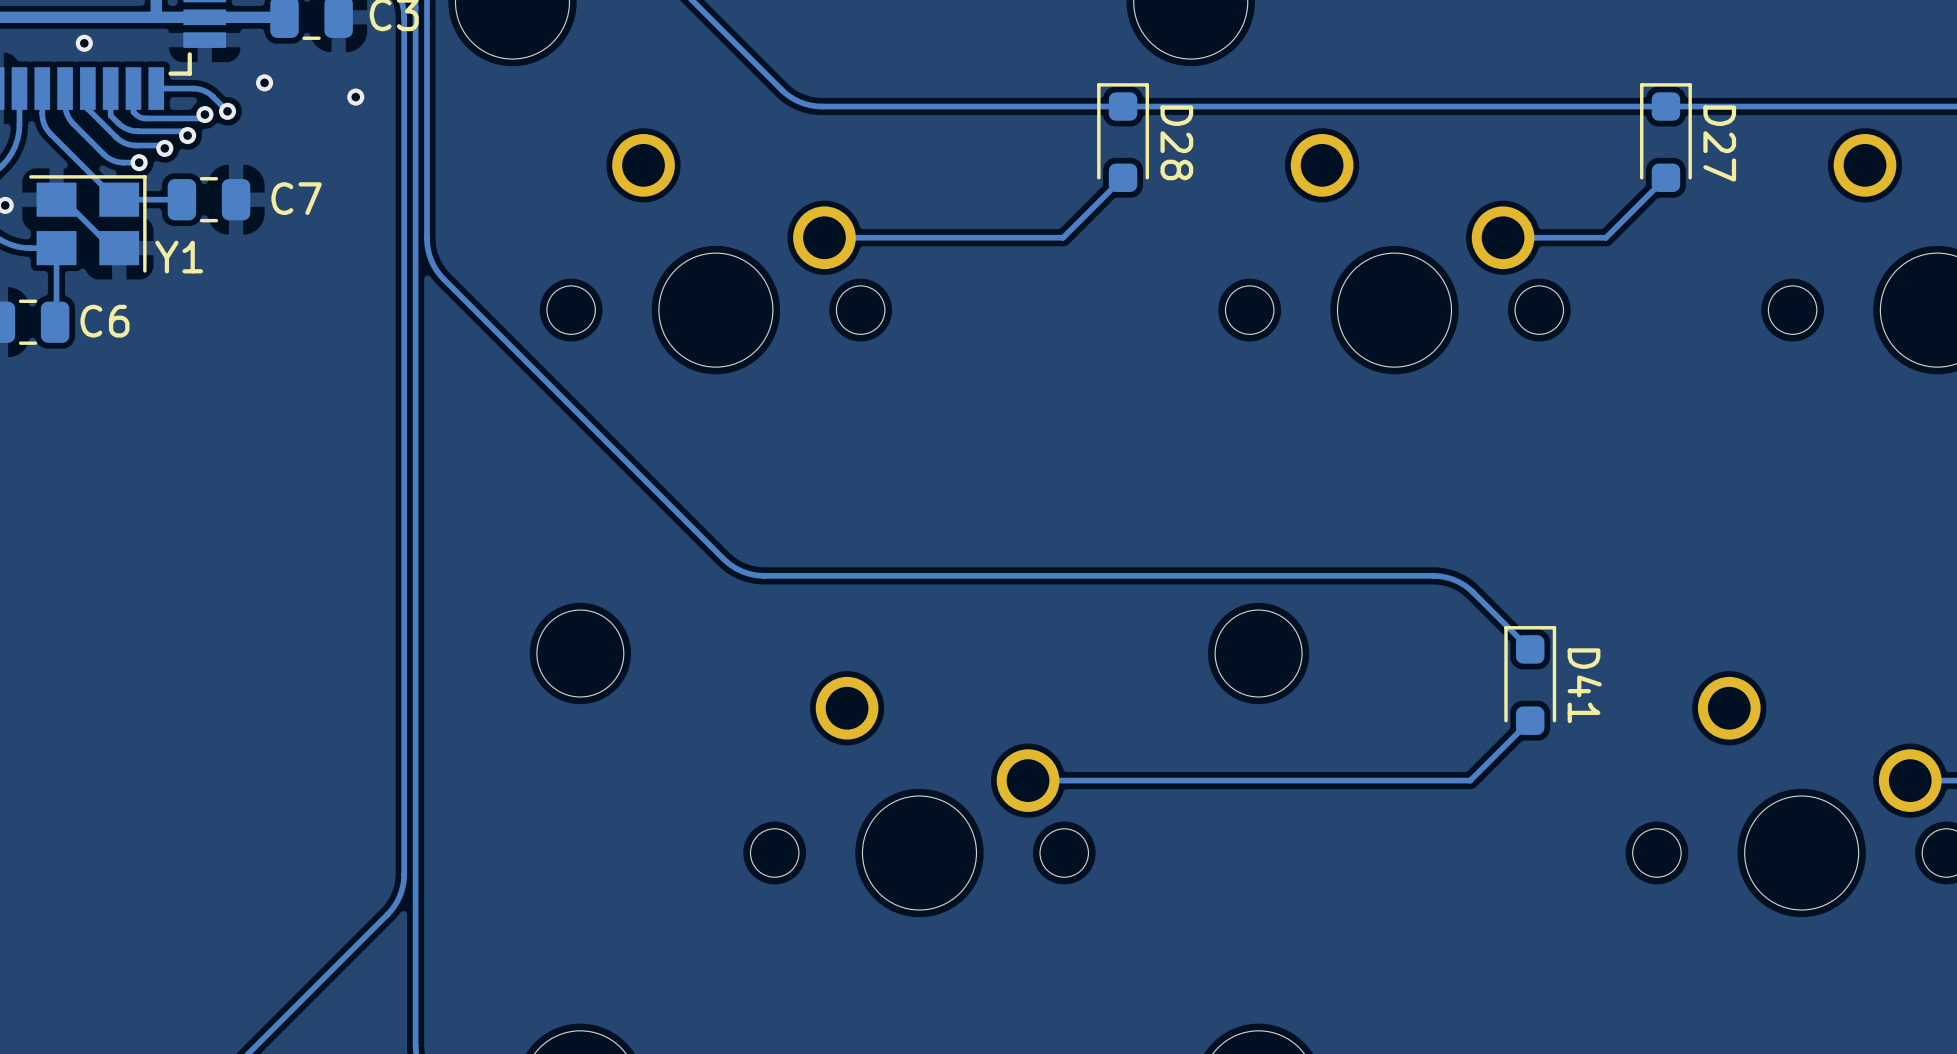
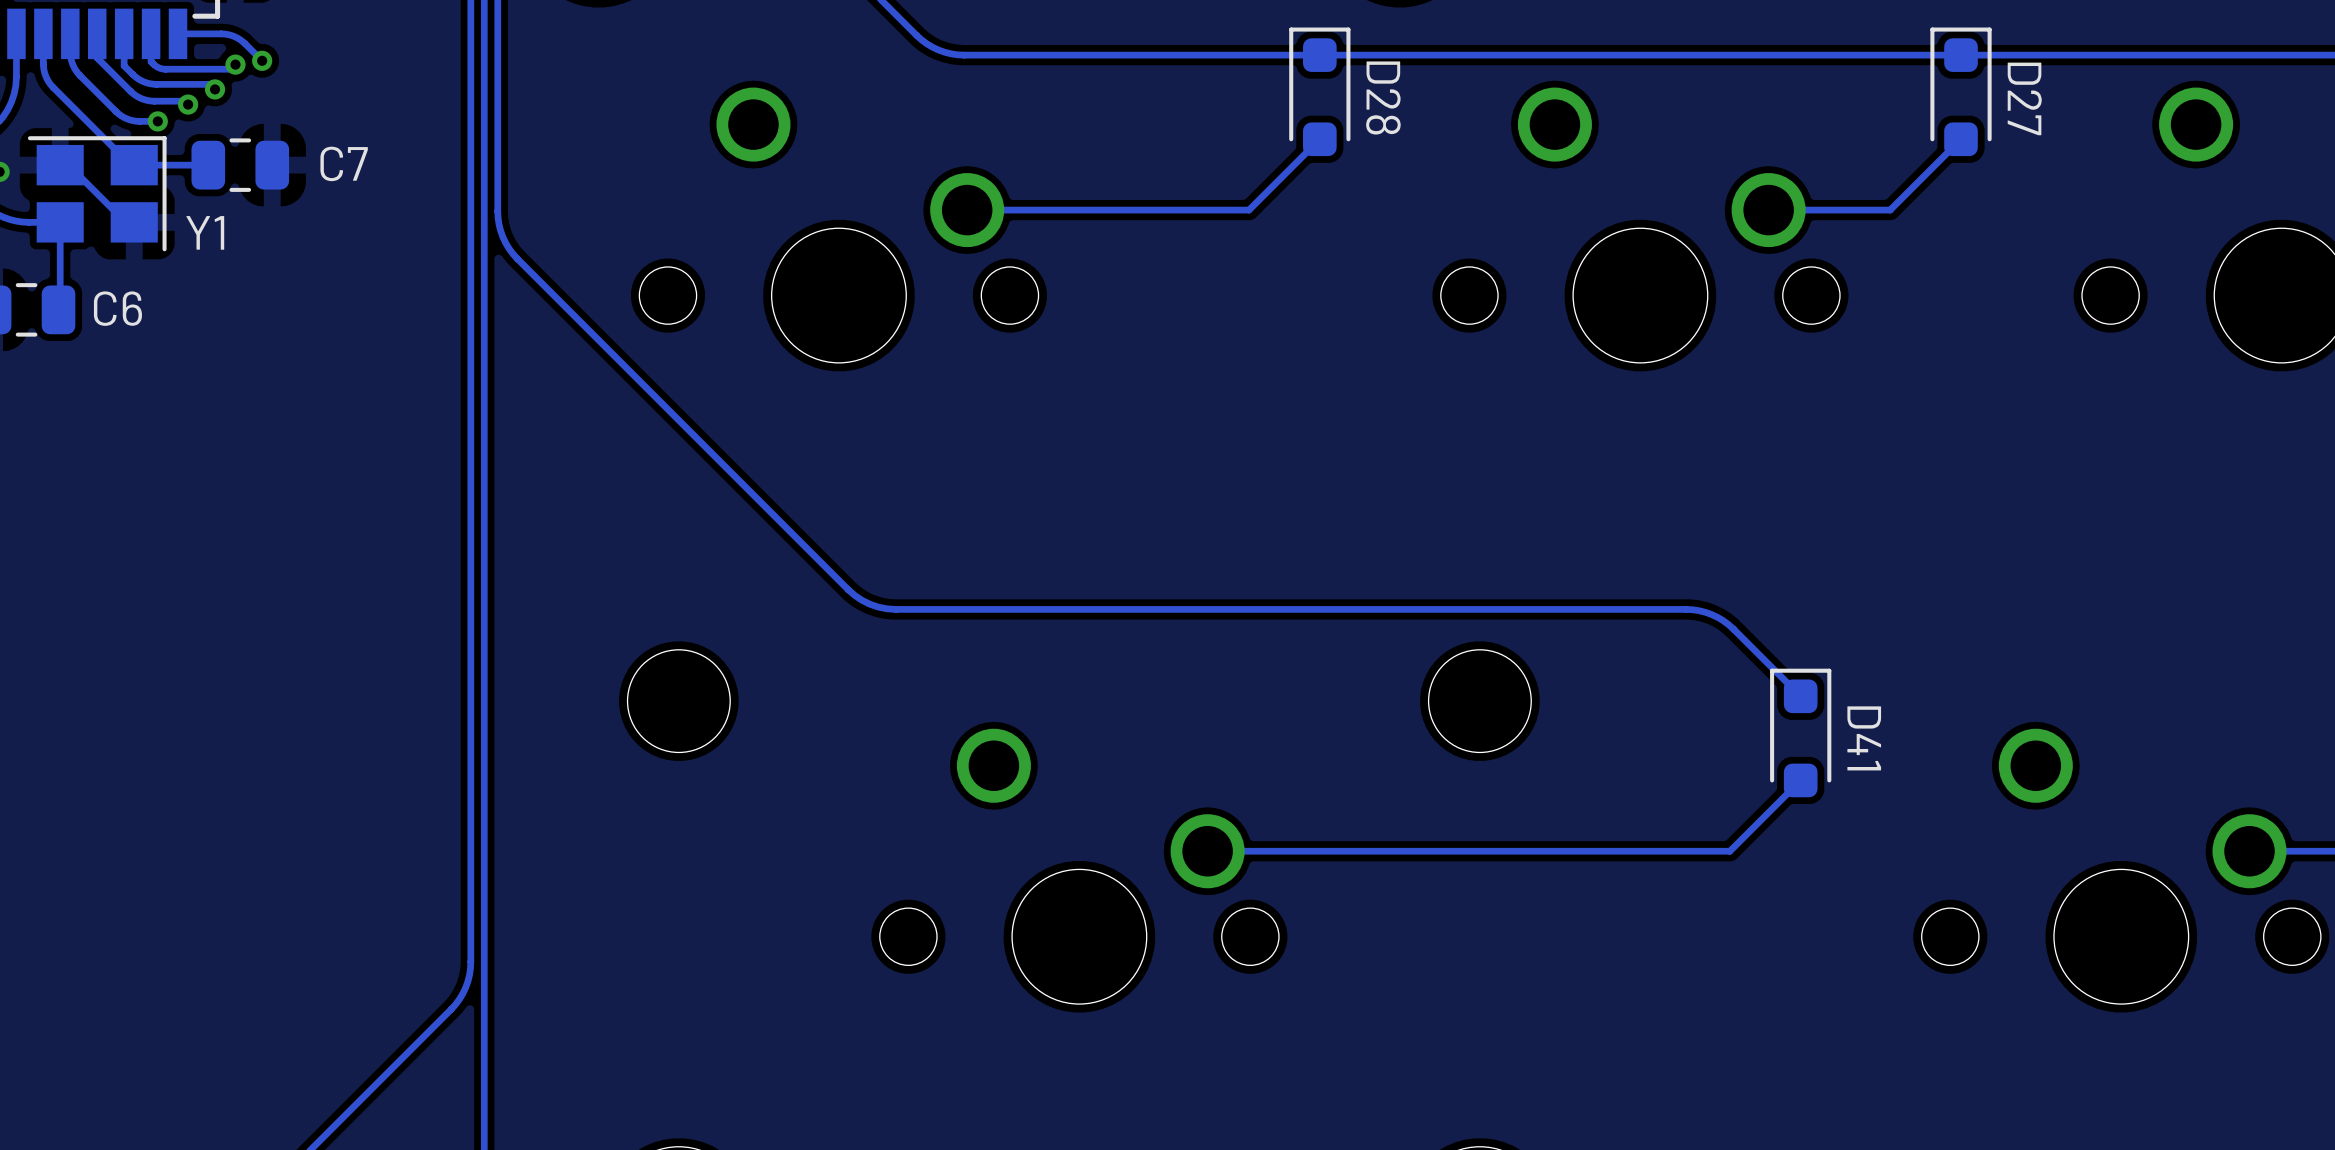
via: (264, 82) -> none
via: (355, 97) -> none

